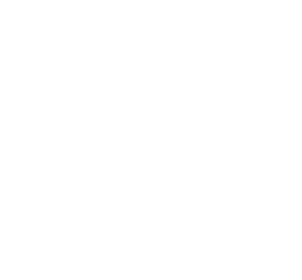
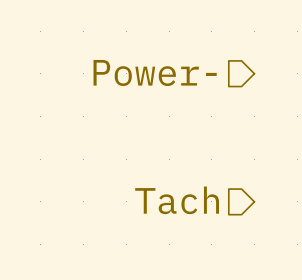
hierarchical label: none -> Power- (155, 72)
hierarchical label: none -> Tach (177, 200)

